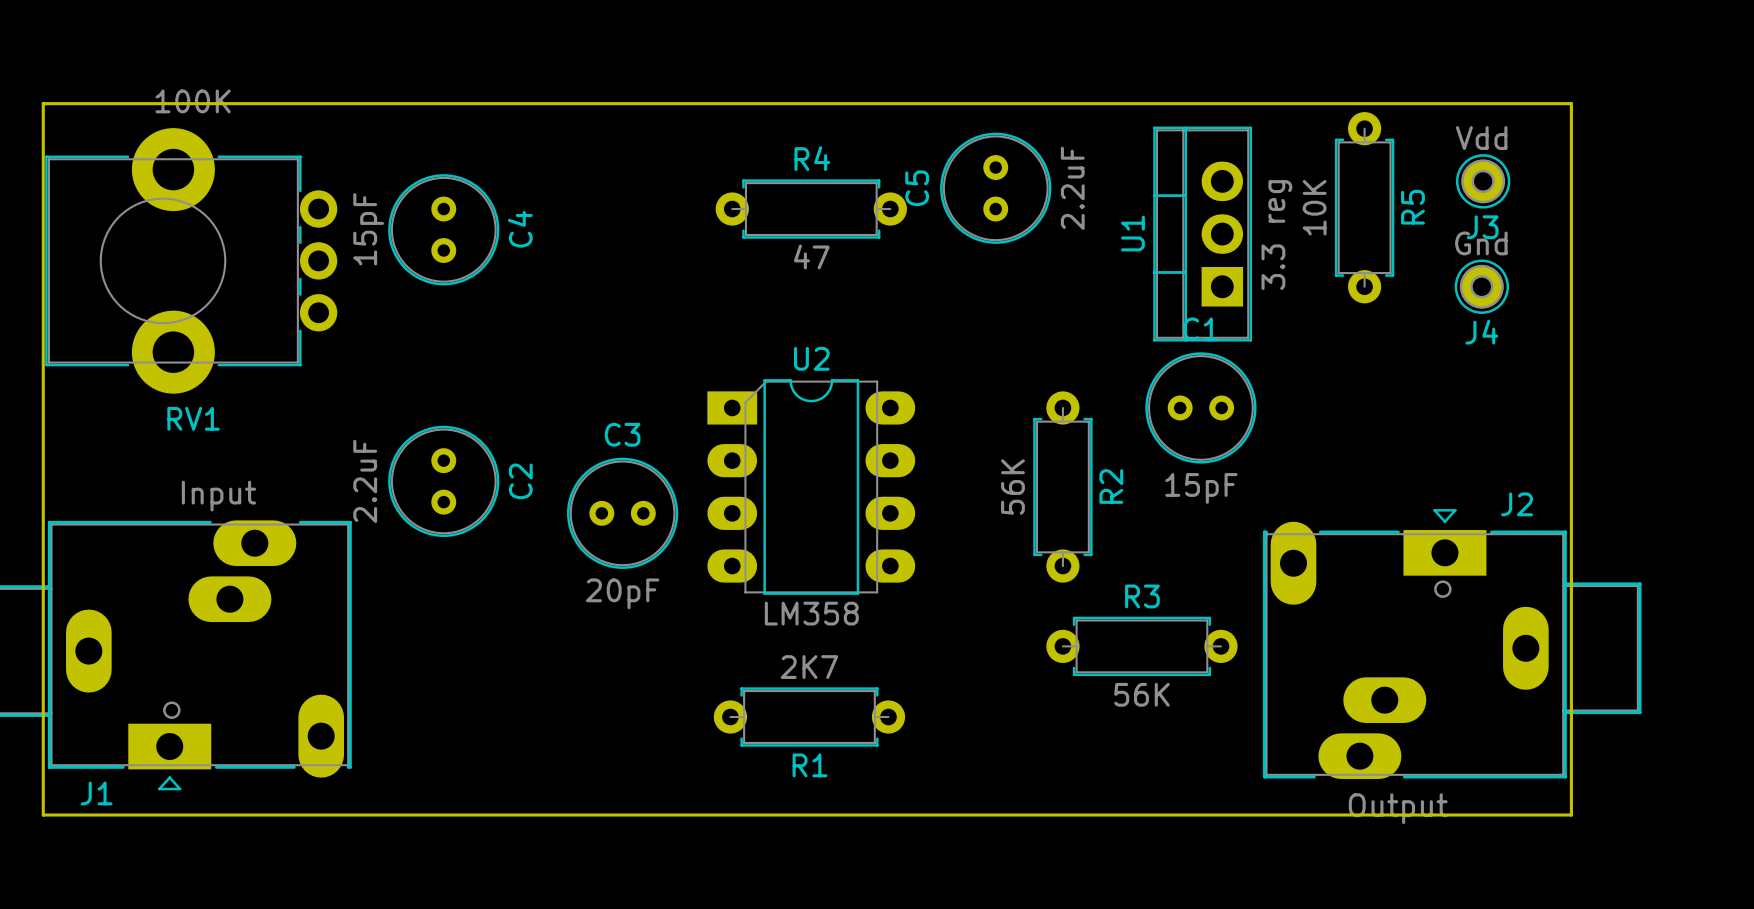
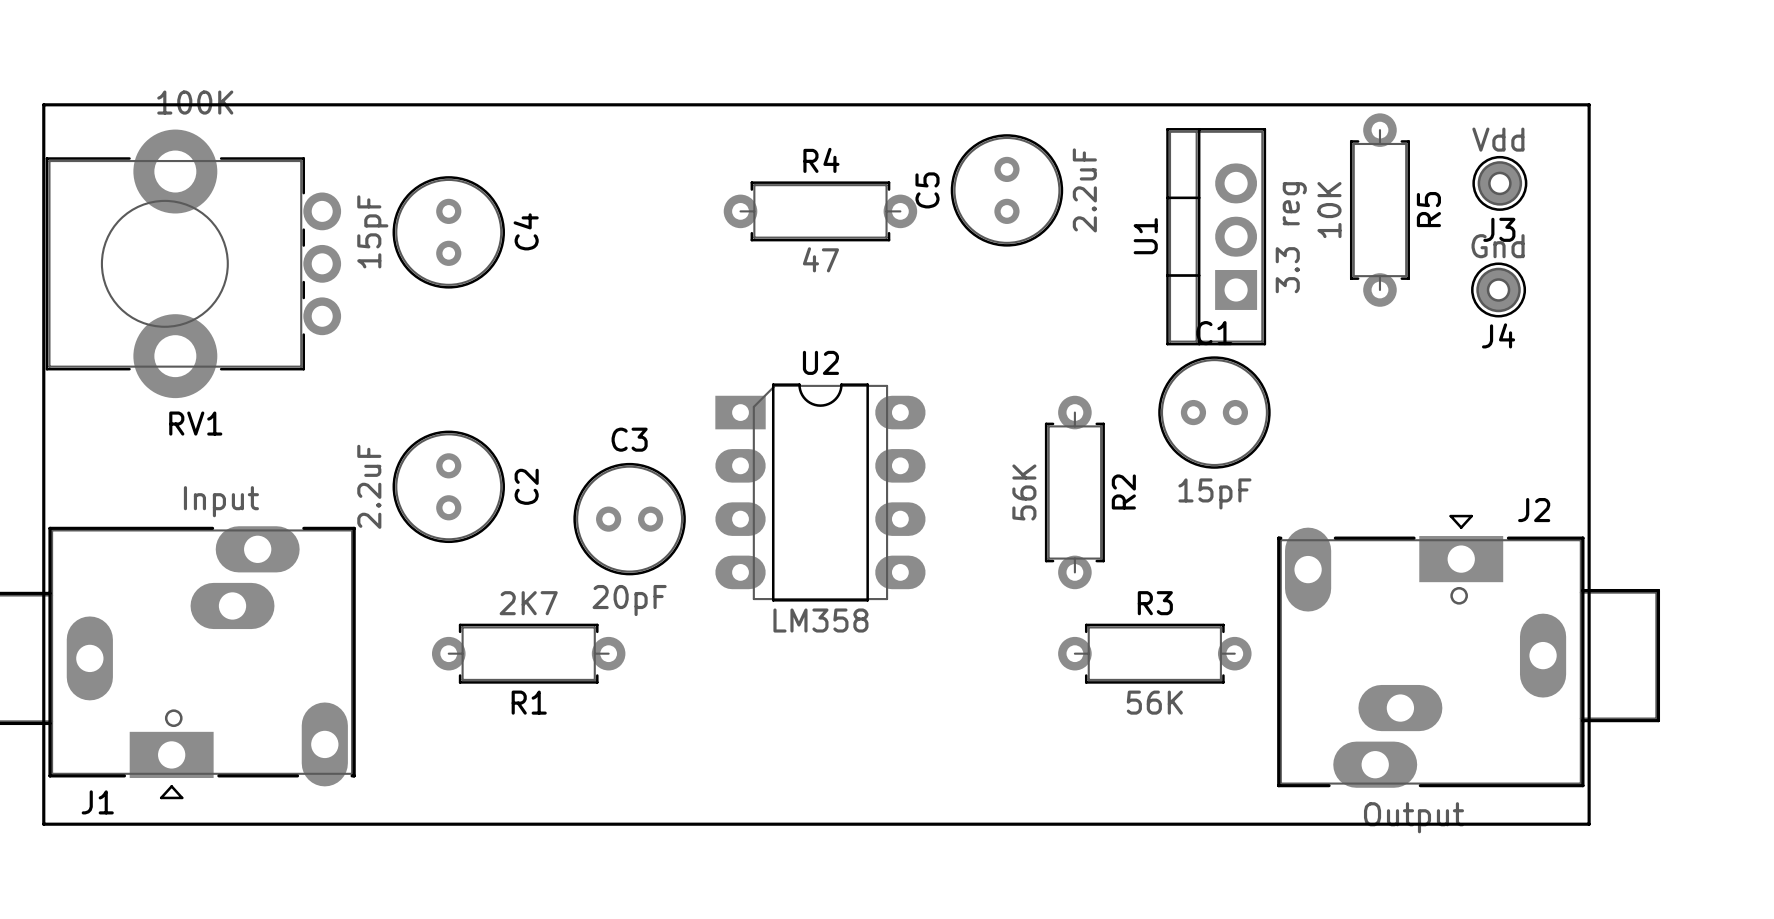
R1 position: (809, 717) -> (528, 653)

